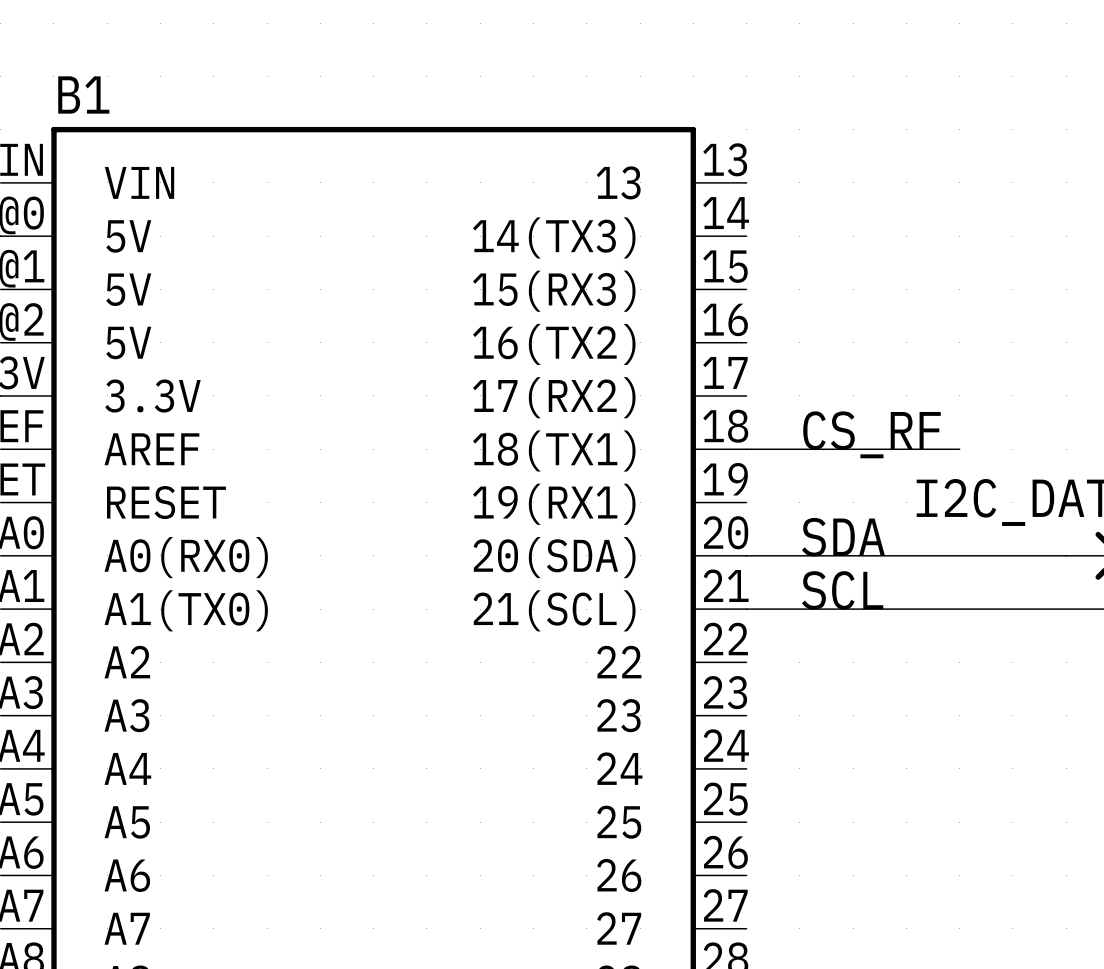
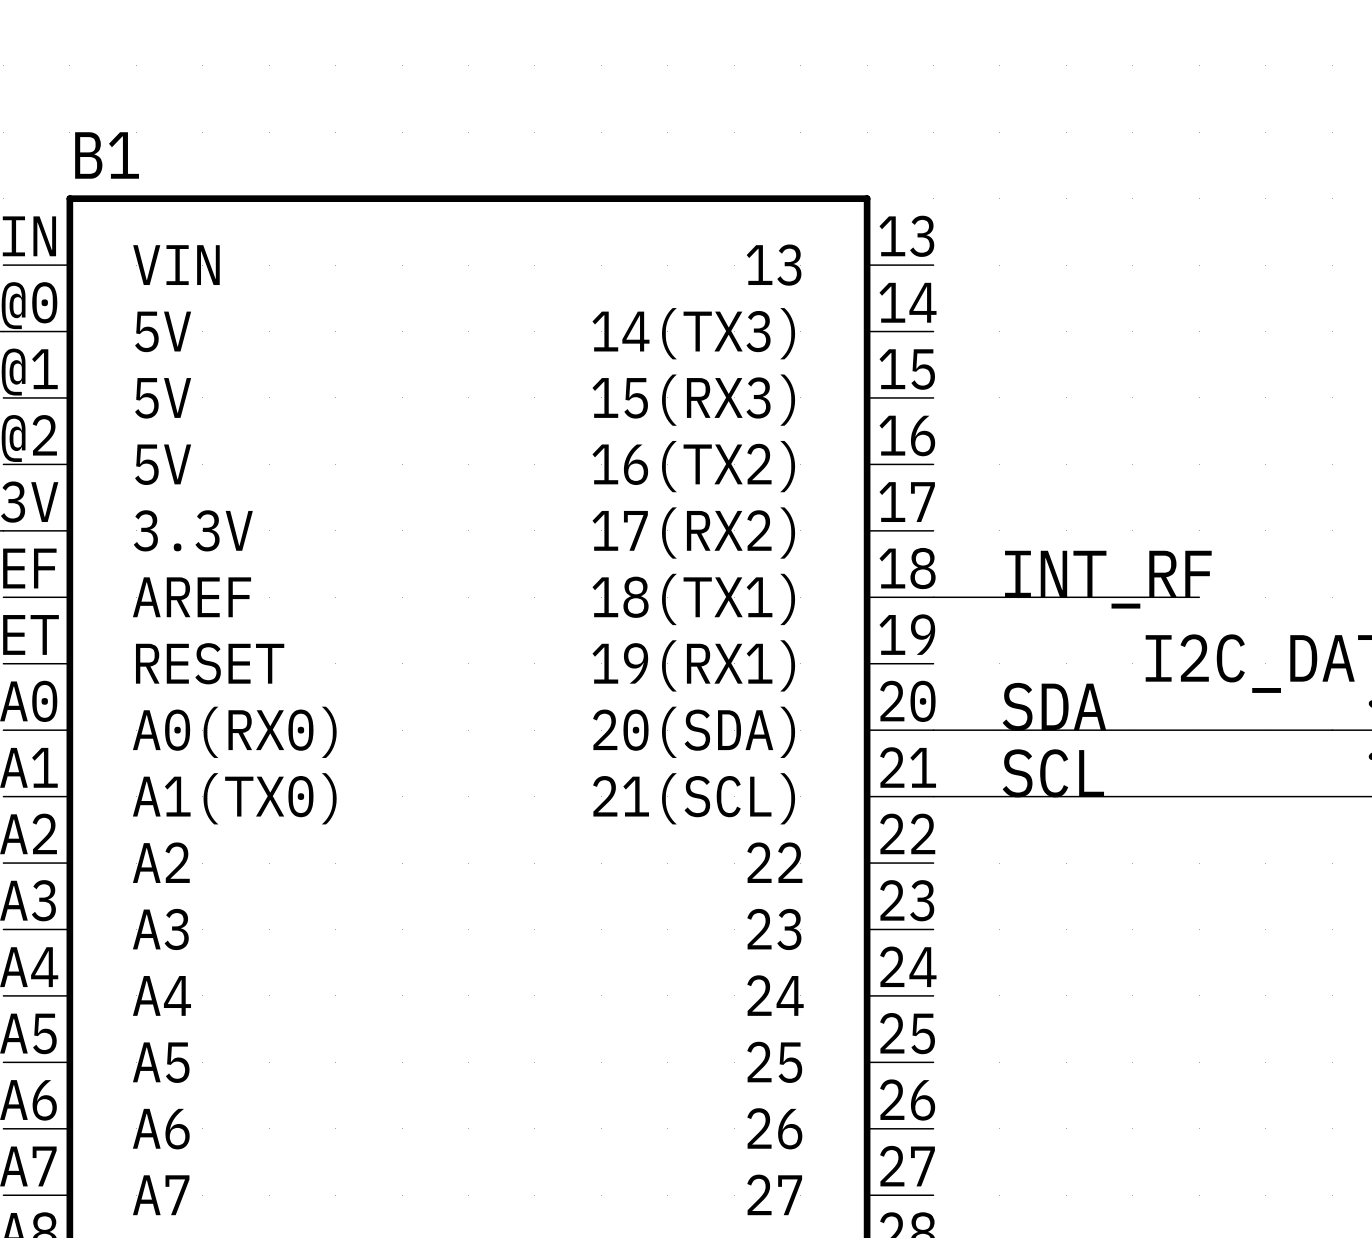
label: CS_RF (871, 434) -> INT_RF (1108, 579)

